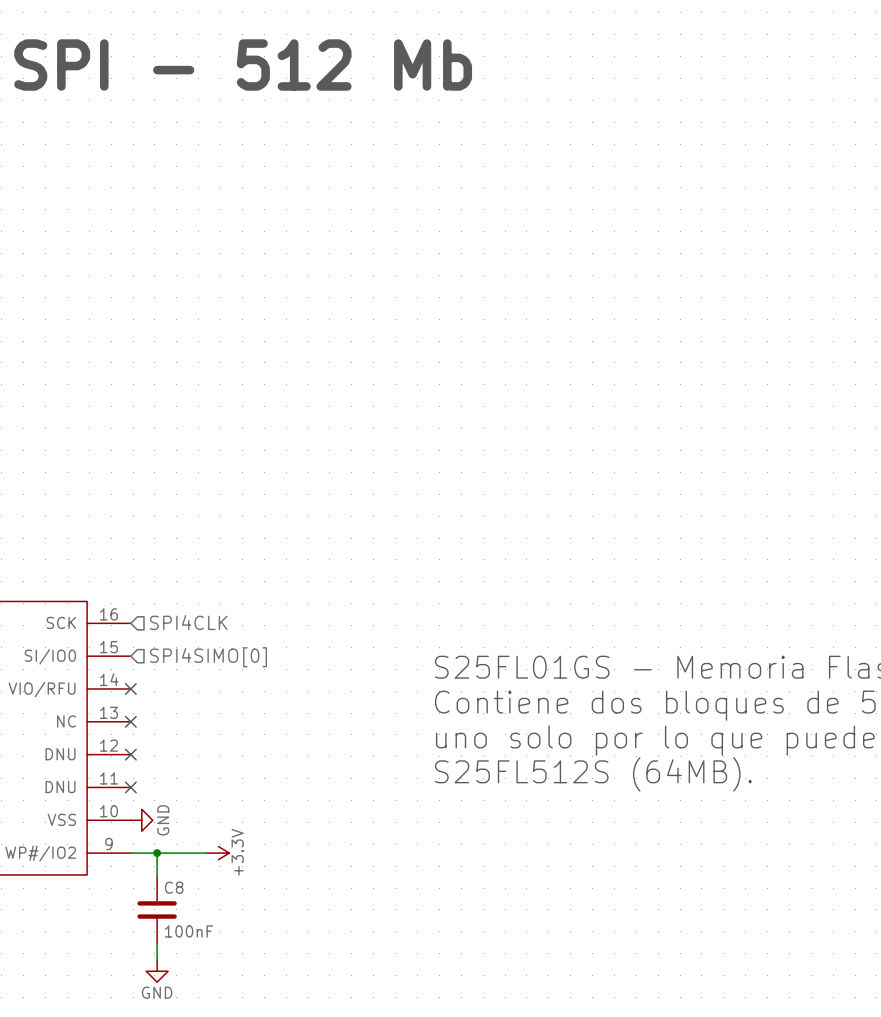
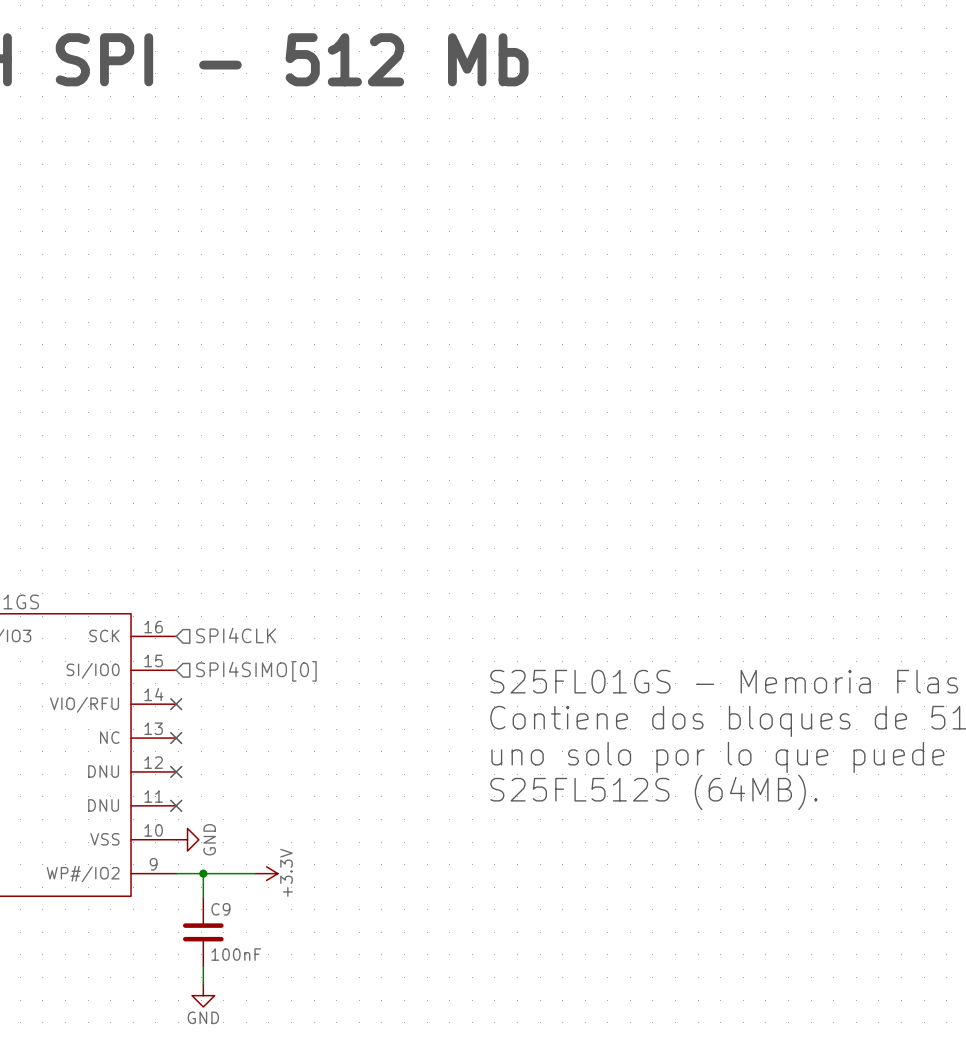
C8 name: C8 (174, 887) -> C9 (220, 909)

